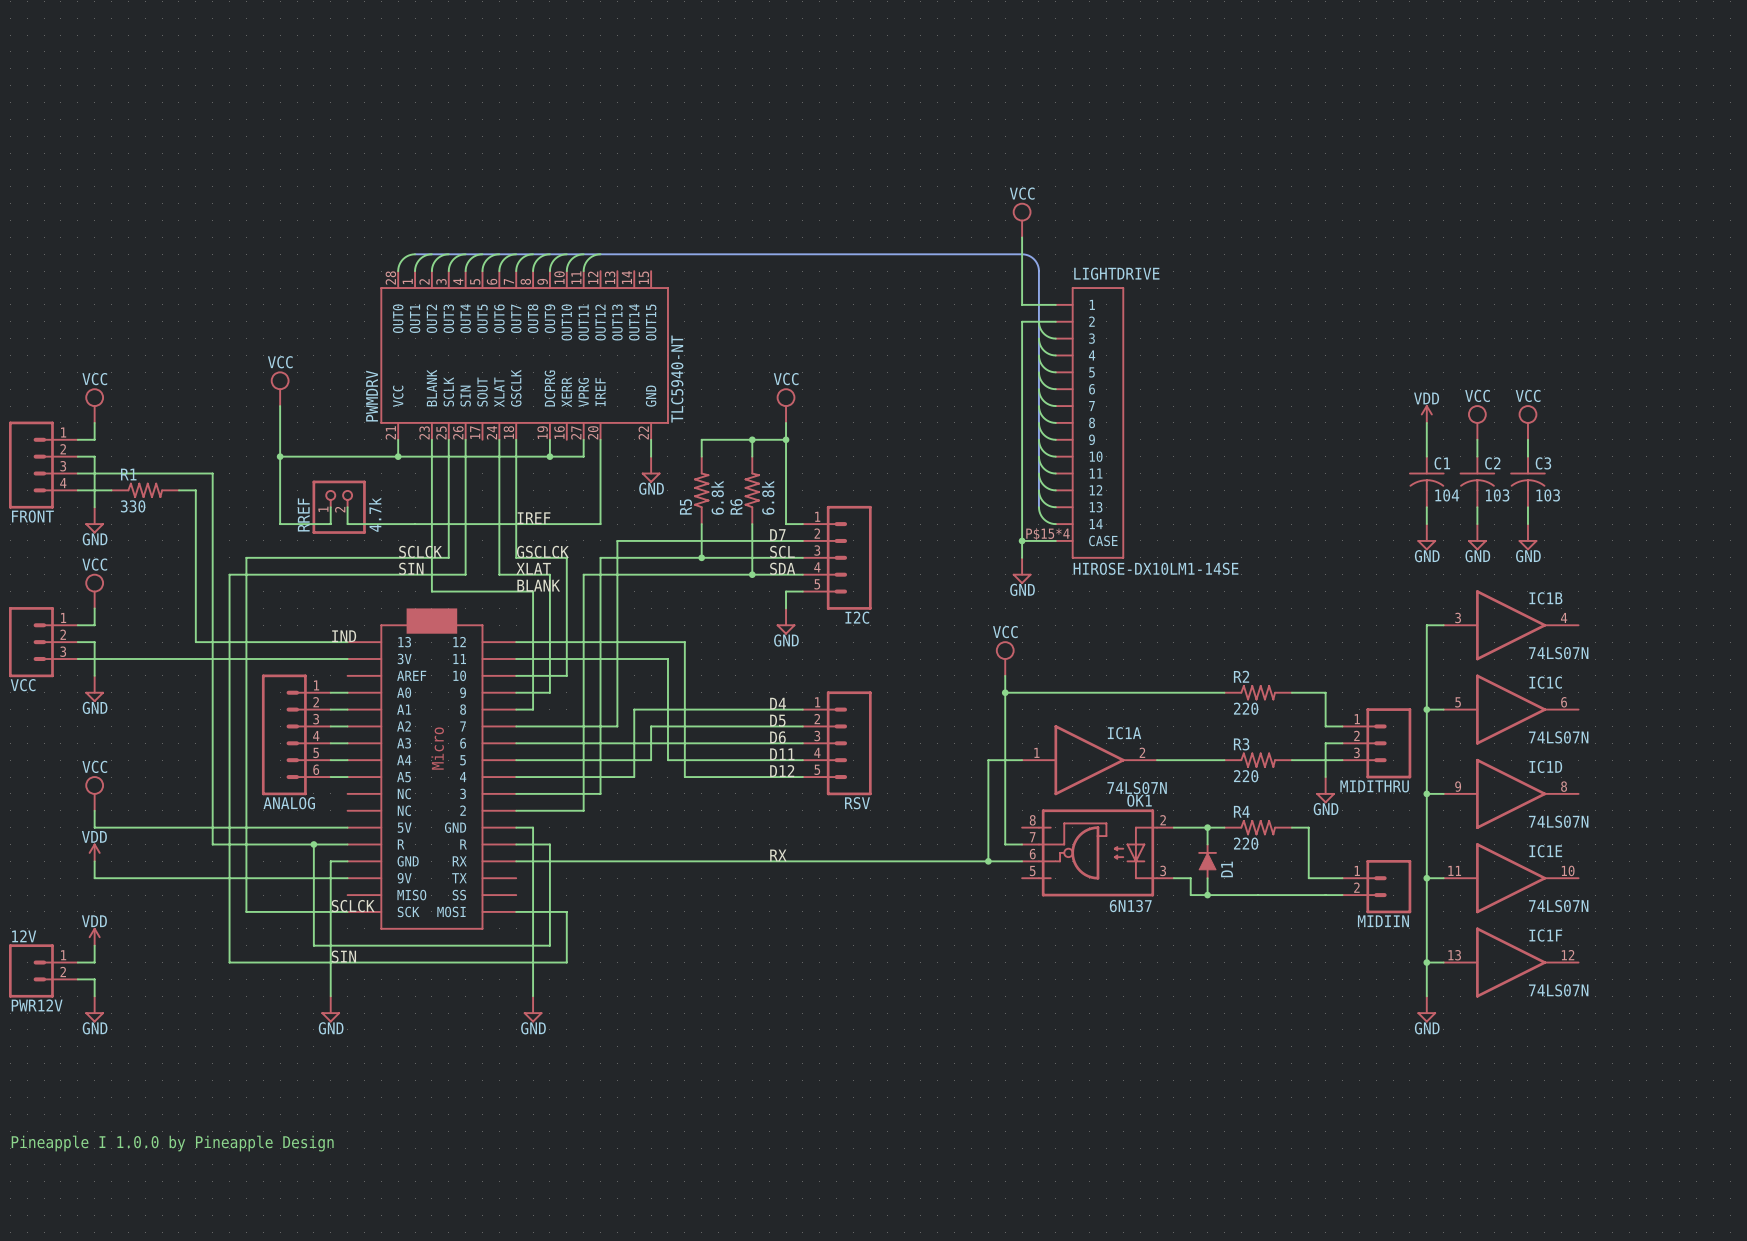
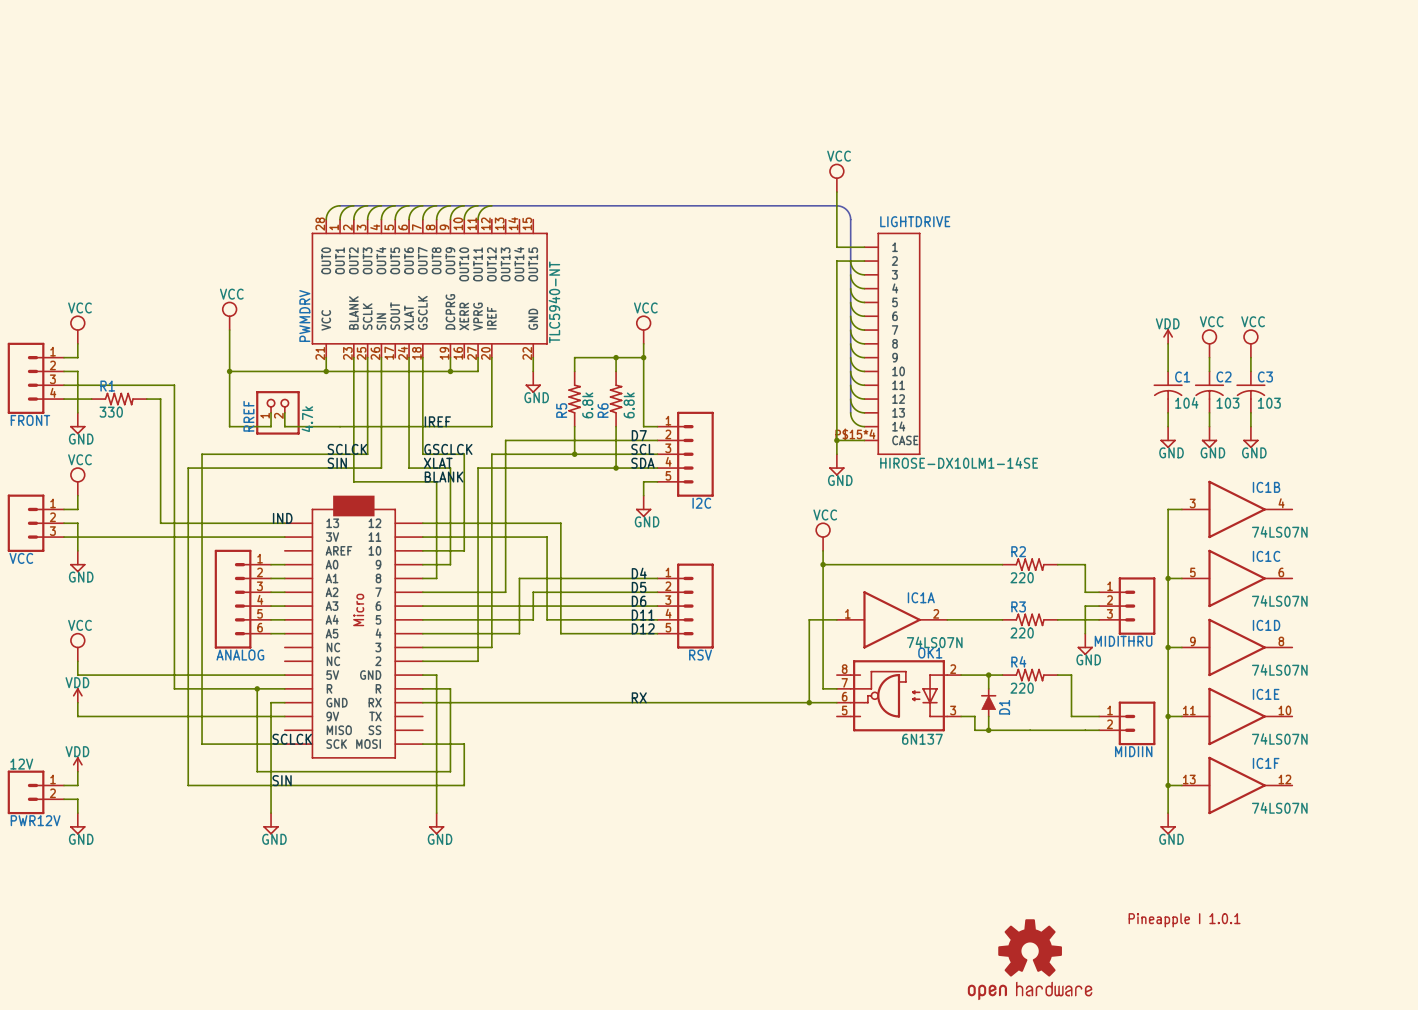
text: none -> Pineapple I 1.0.1 (1184, 920)
text: Pineapple I 1.0.0 by Pineapple Design (172, 1143) -> none
part: none -> (1030, 959)

